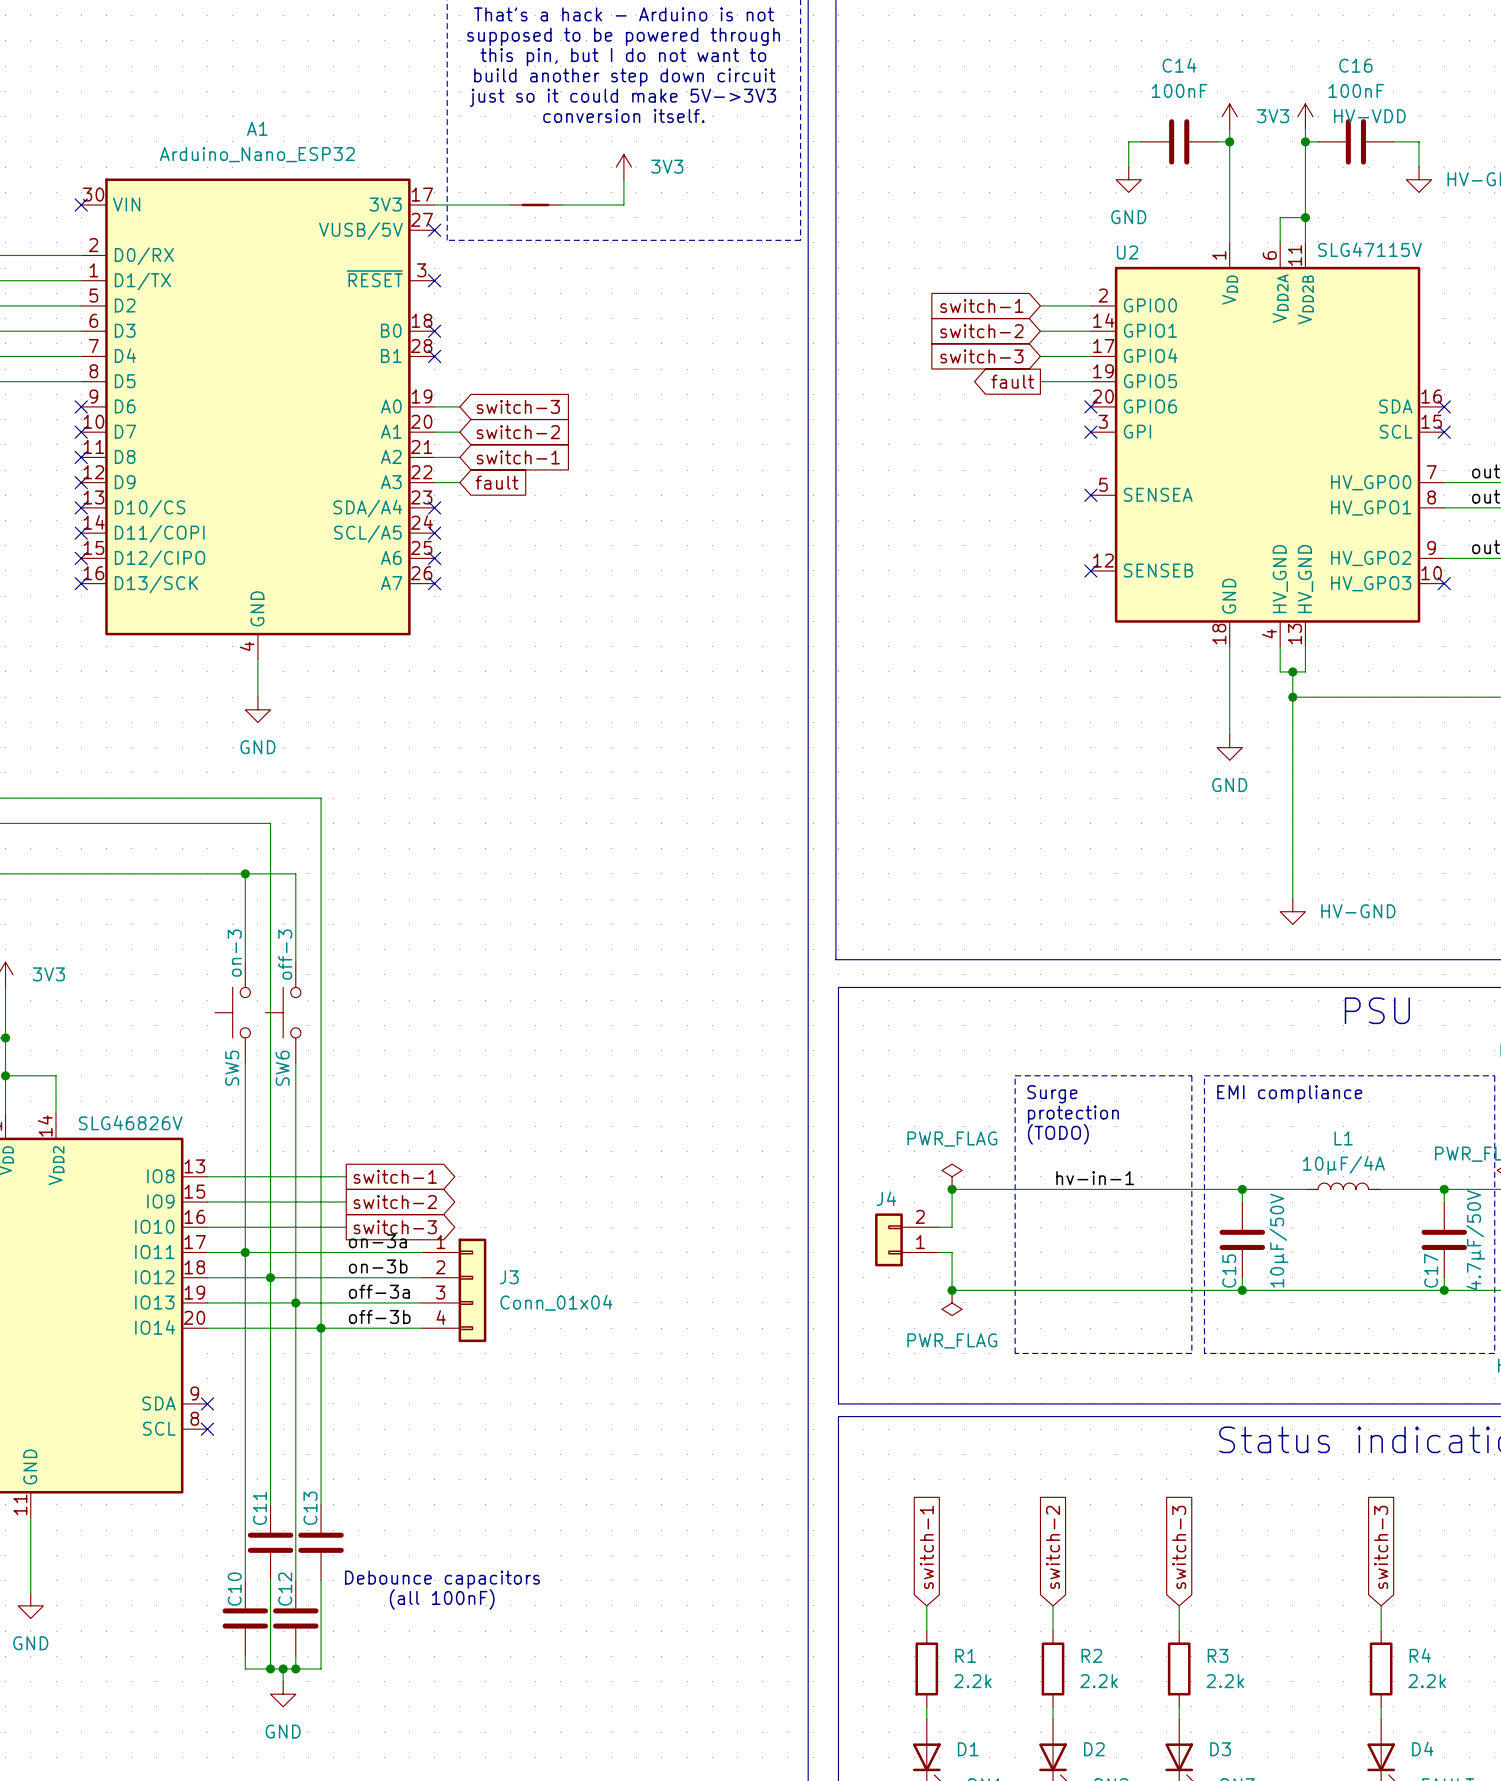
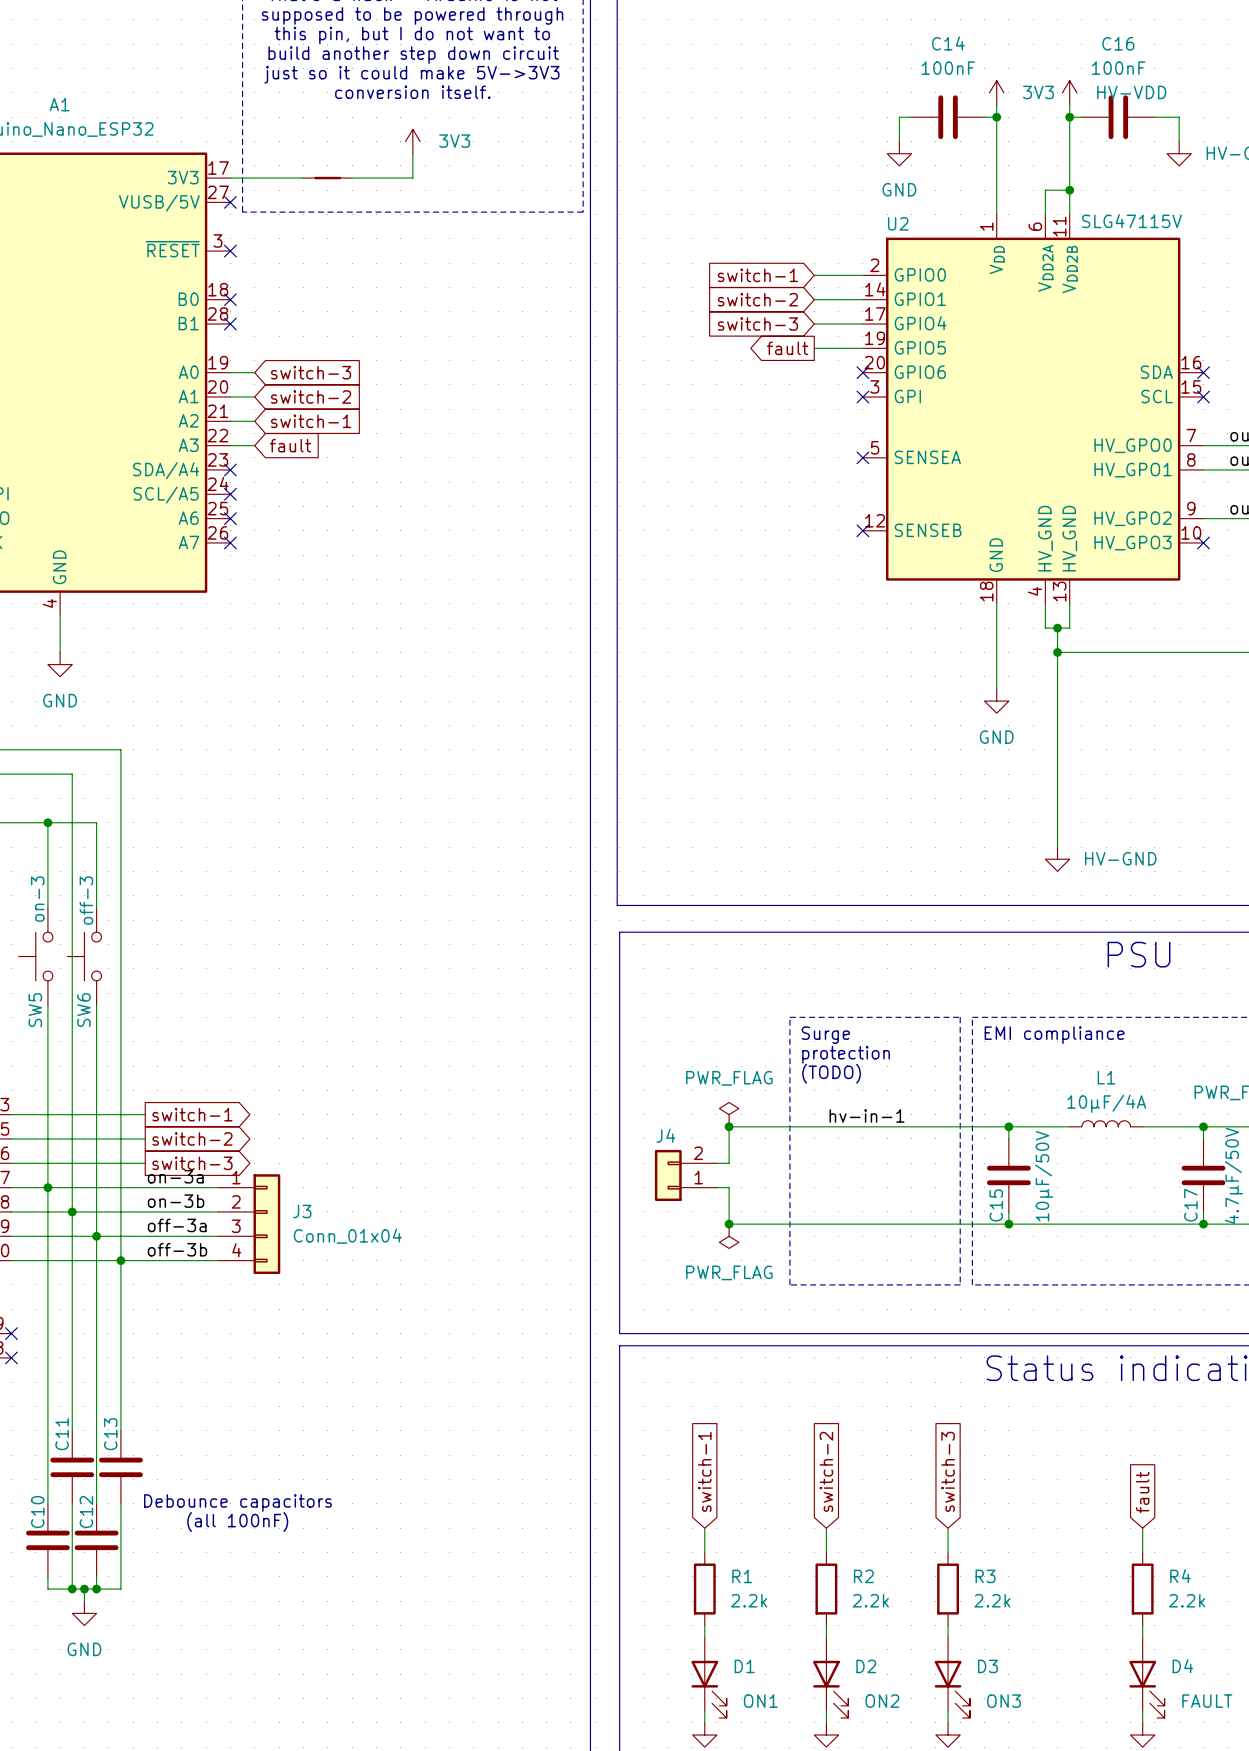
global label: switch-3 (1381, 1547) -> fault (1142, 1492)

